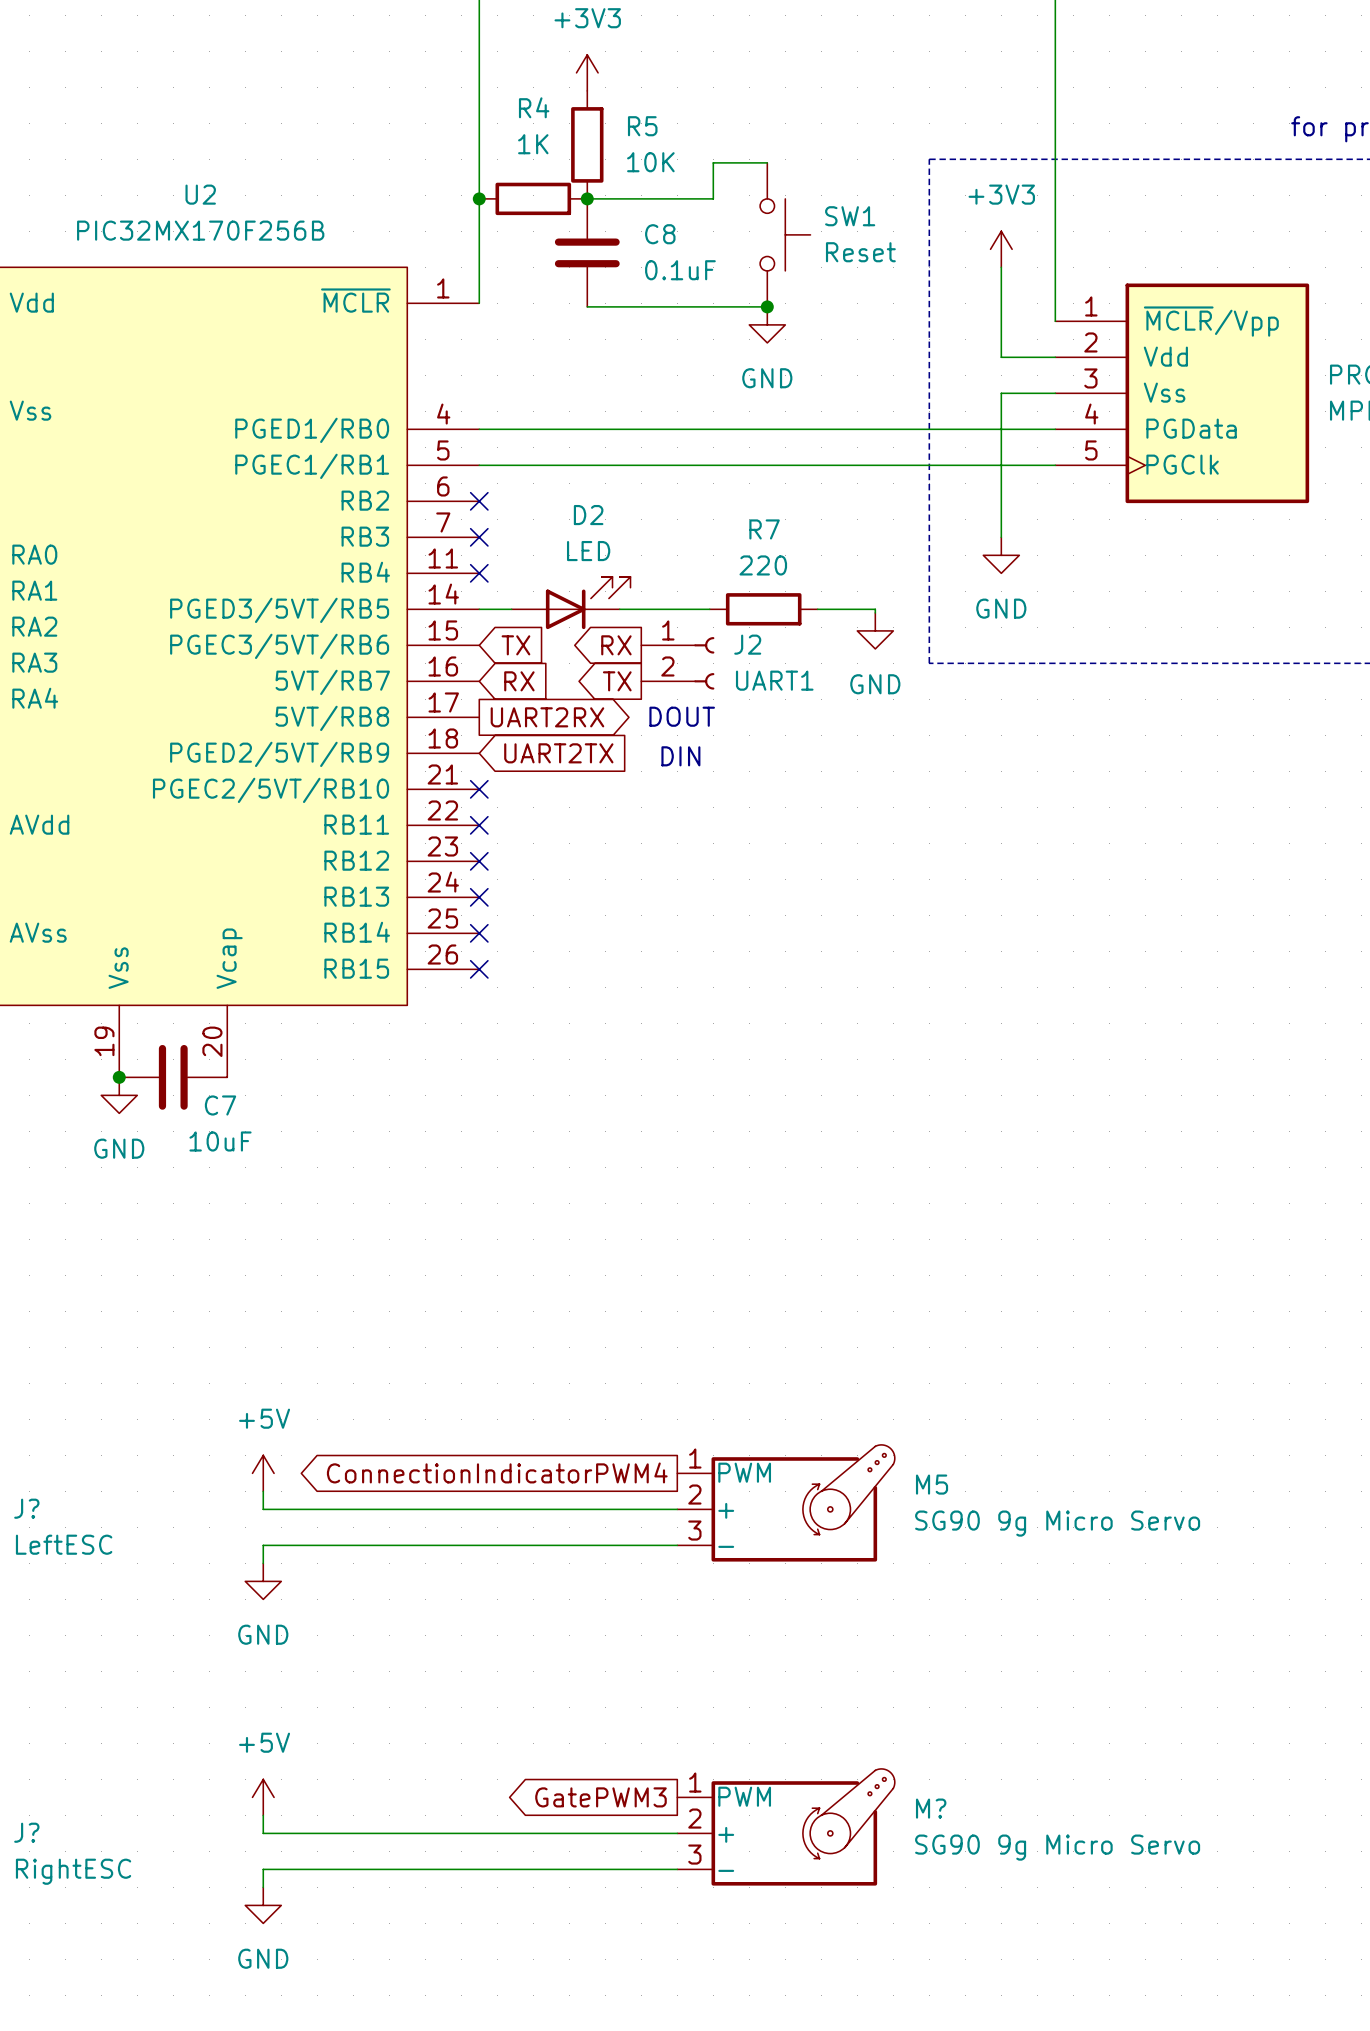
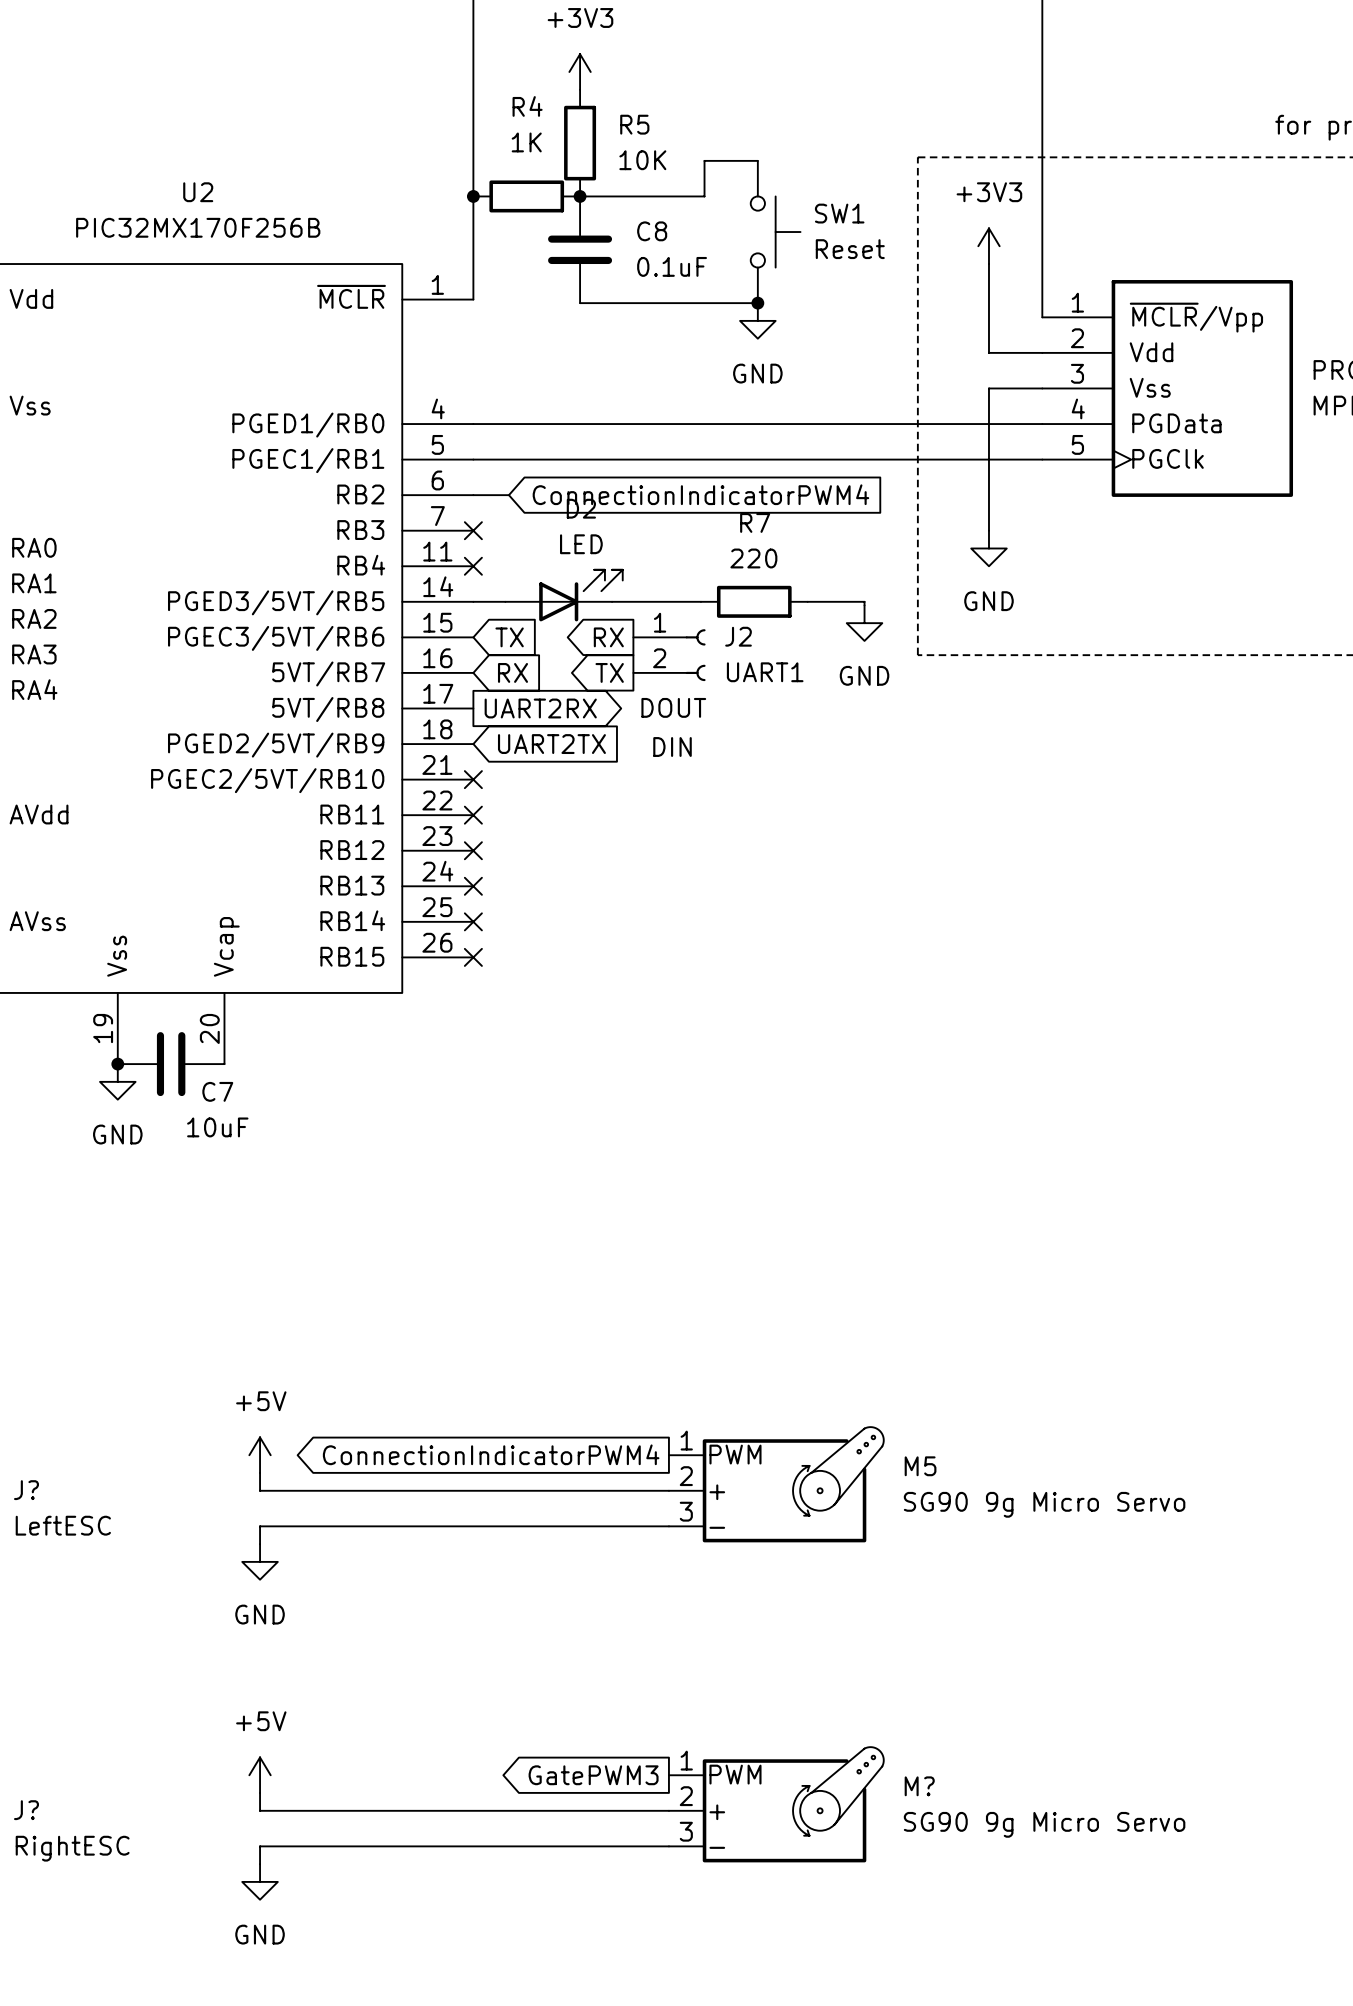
global label: none -> ConnectionIndicatorPWM4 (700, 494)
wire: none -> (473, 495) (508, 495)
no-connect mark: (479, 501) -> none

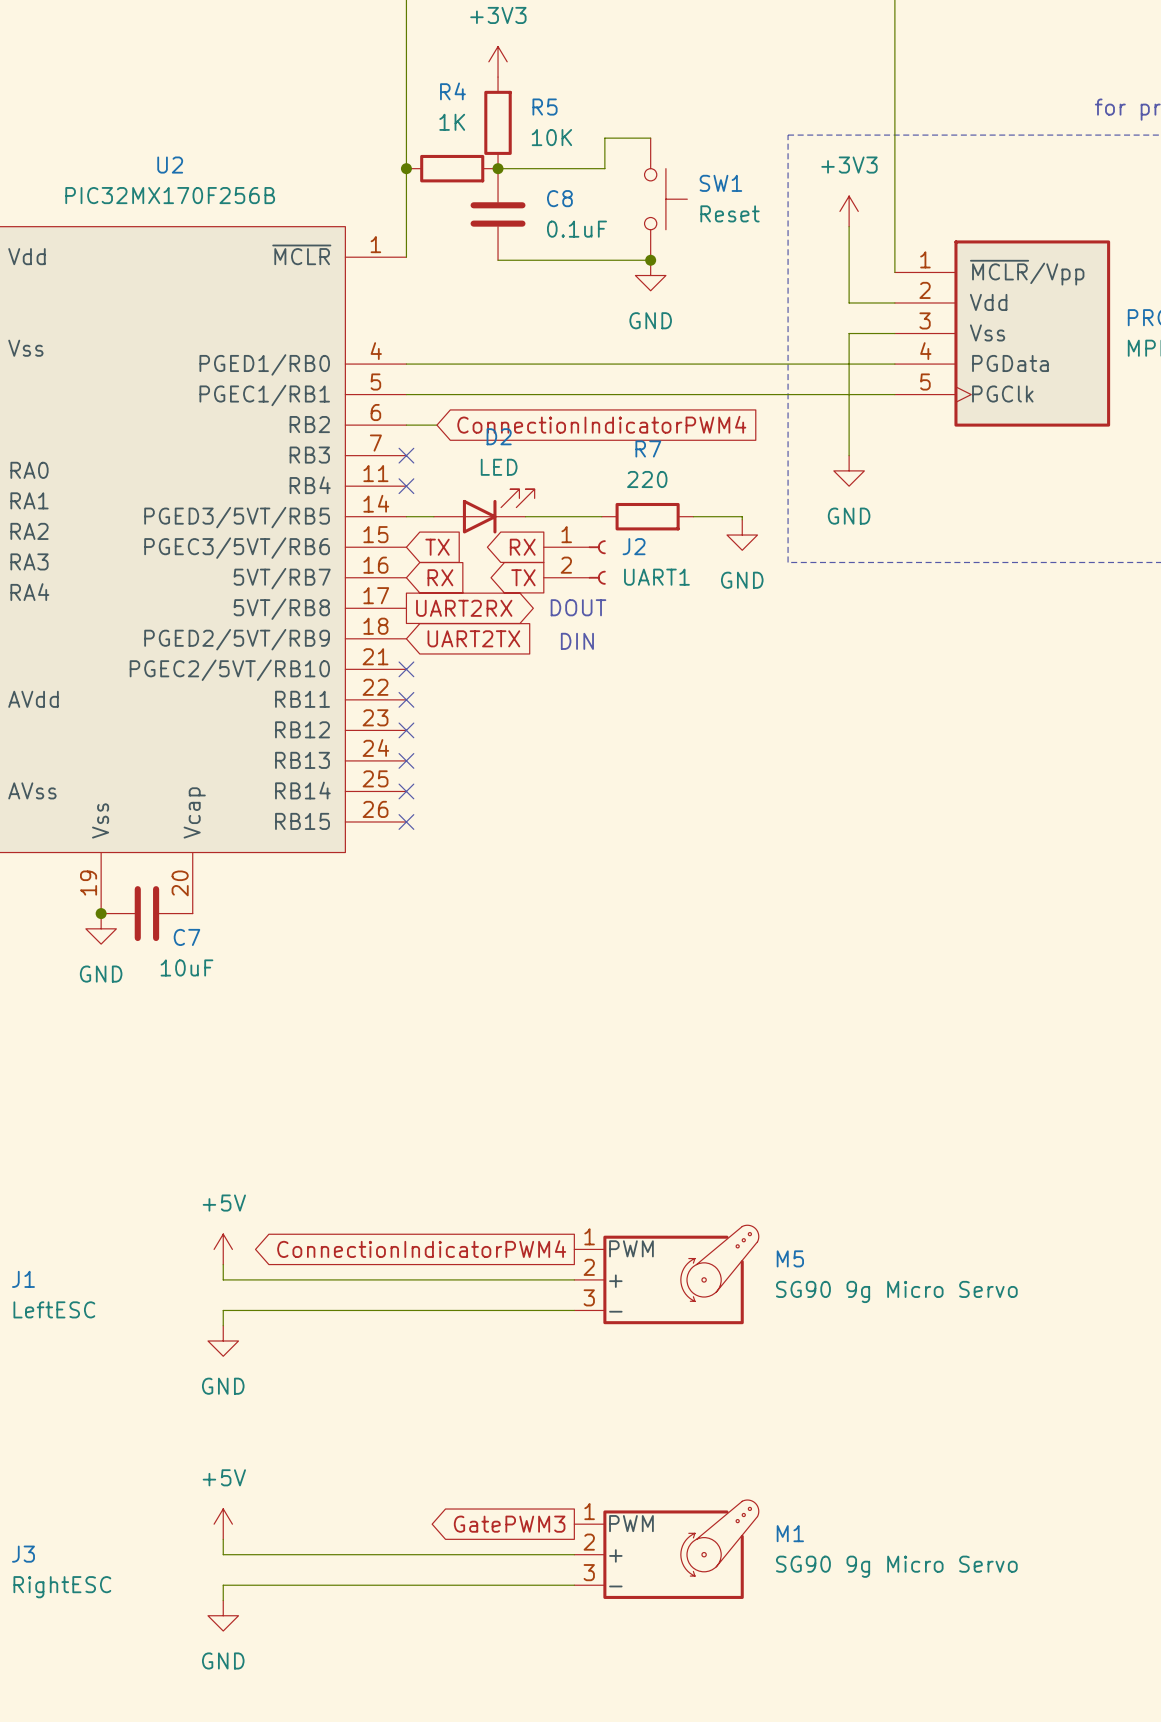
J? name: J? (26, 1490) -> J1 (23, 1279)
M? name: M? (919, 1786) -> M1 (790, 1533)
J? name: J? (26, 1810) -> J3 (23, 1554)

